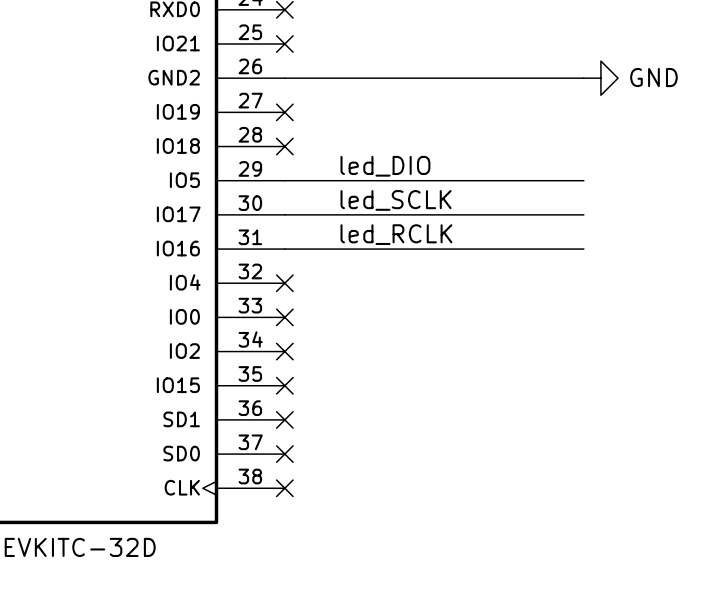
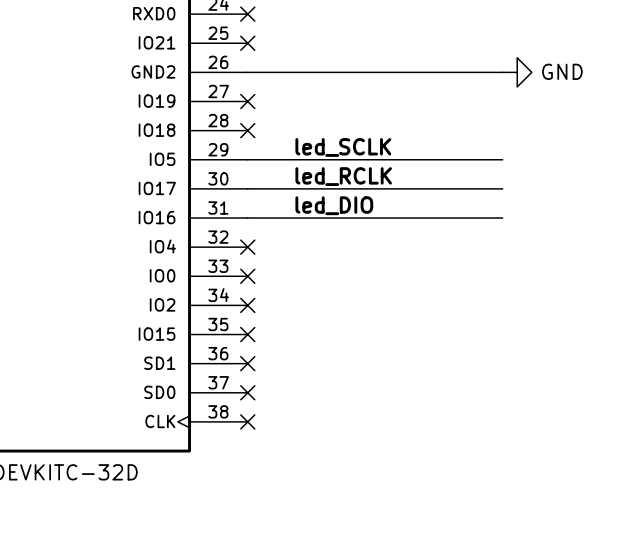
label: led_DIO (385, 166) -> led_SCLK (343, 147)
label: led_SCLK (396, 200) -> led_RCLK (343, 176)
label: led_RCLK (396, 234) -> led_DIO (334, 205)

